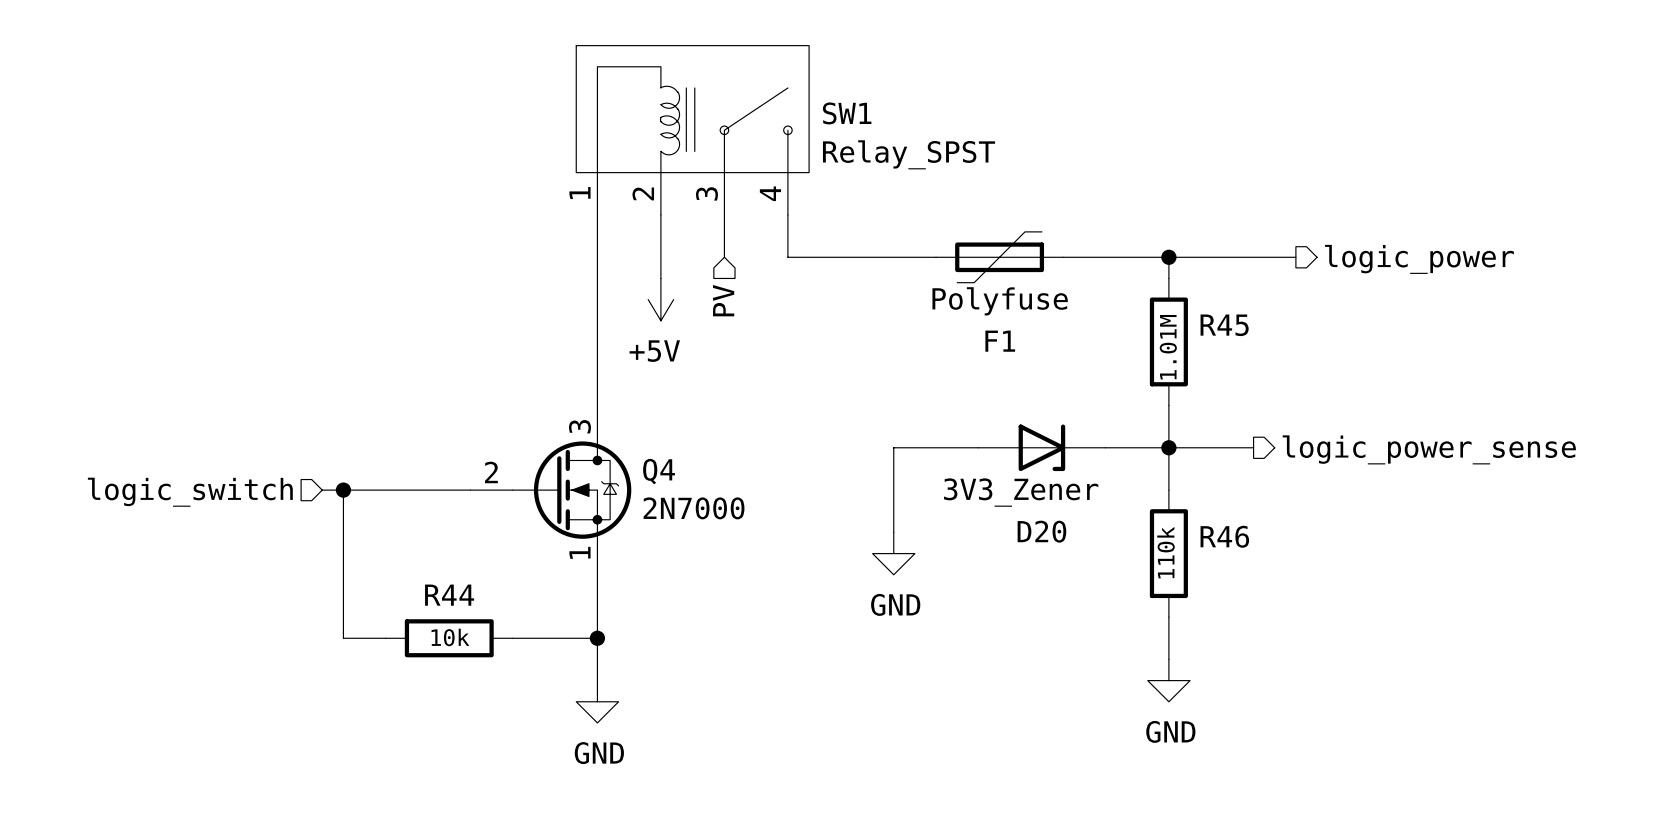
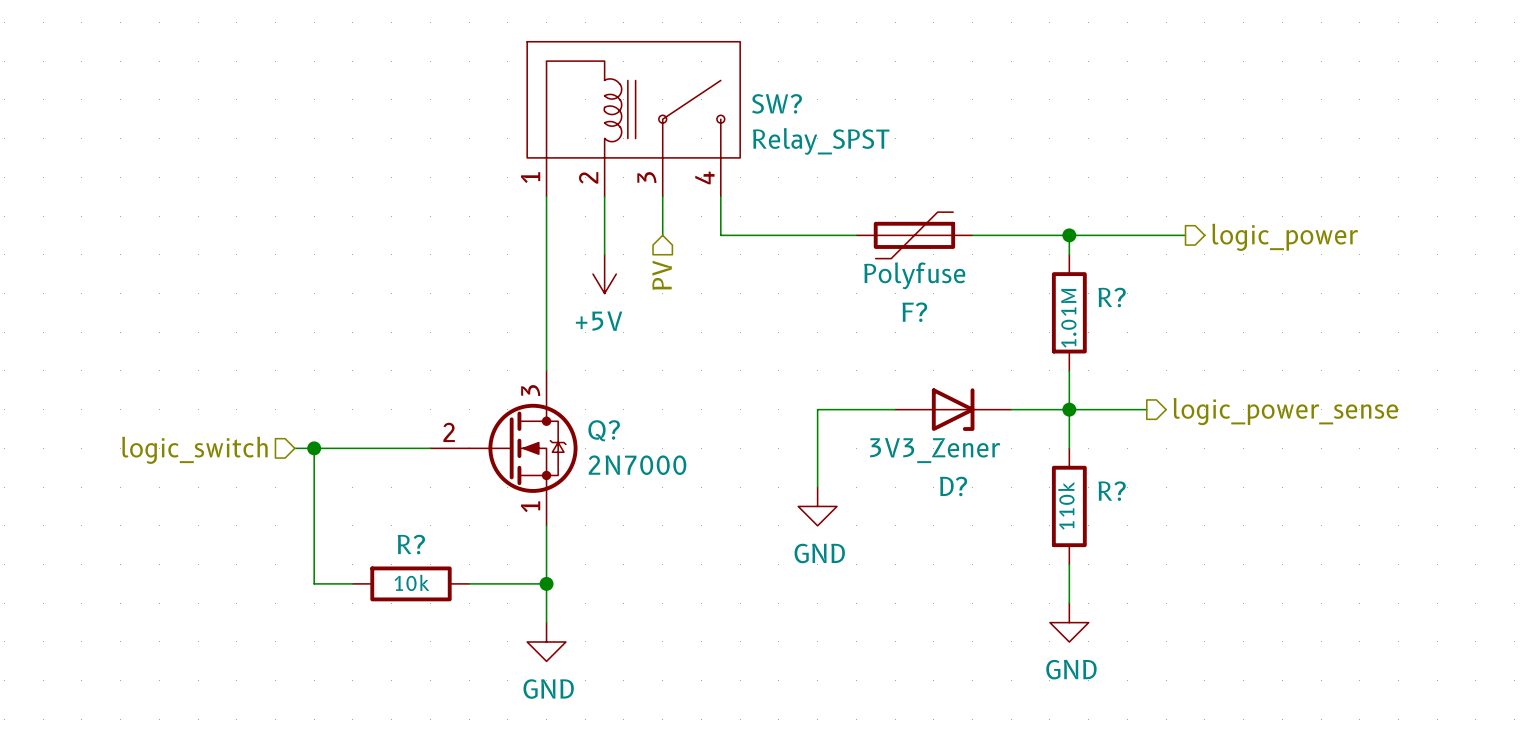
SW1 name: SW1 (847, 113) -> SW? (777, 103)
R45 name: R45 (1224, 325) -> R? (1112, 297)
F1 name: F1 (1000, 341) -> F? (914, 312)
Q4 name: Q4 (659, 471) -> Q? (604, 430)
D20 name: D20 (1041, 531) -> D? (953, 486)
R46 name: R46 (1224, 536) -> R? (1112, 491)
R44 name: R44 (449, 595) -> R? (411, 544)

